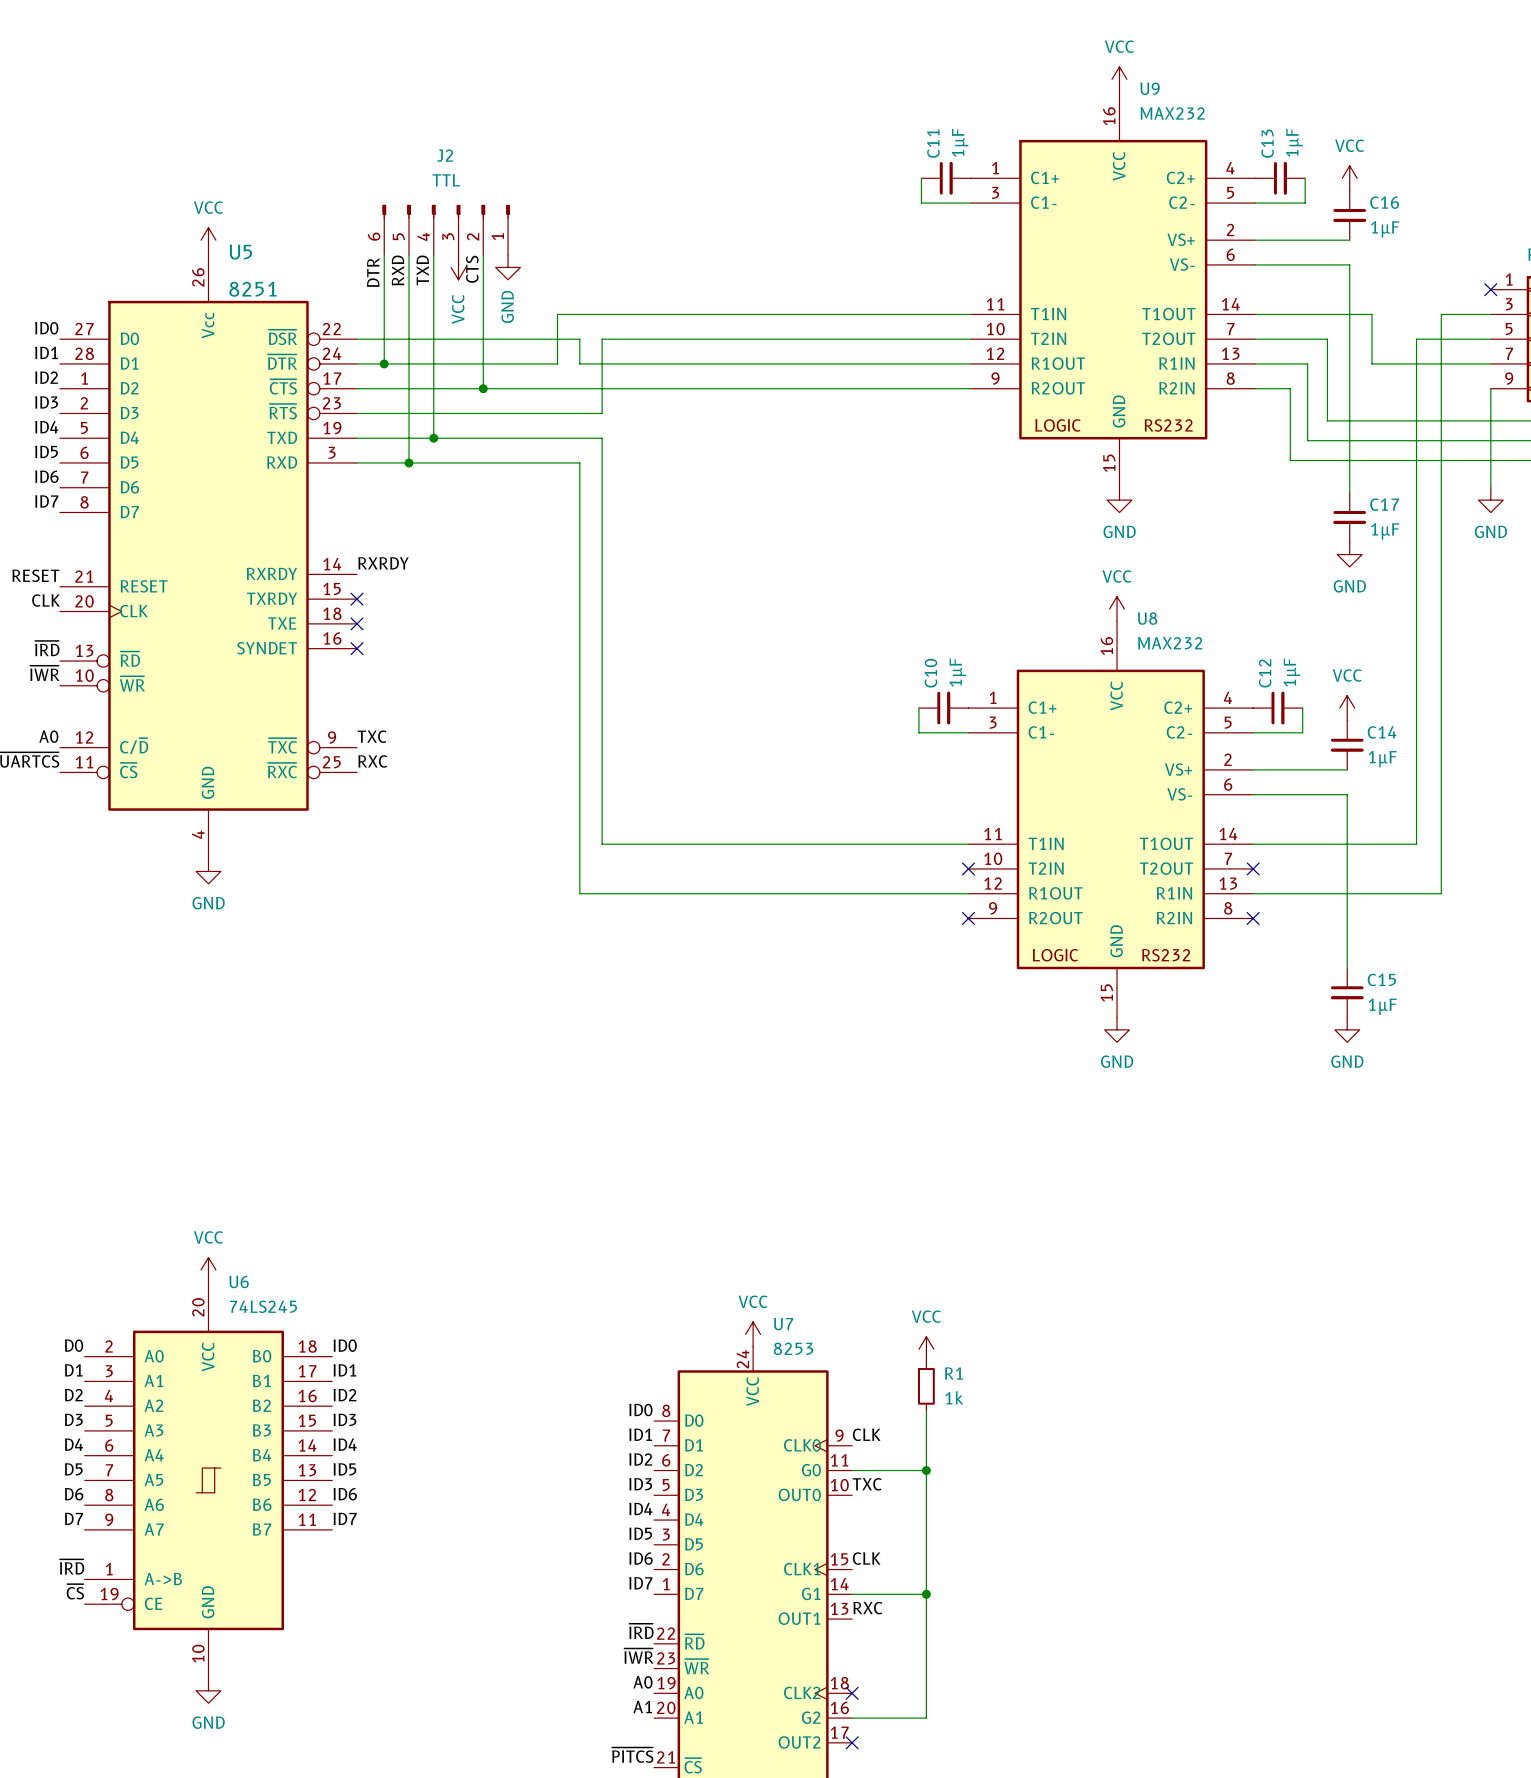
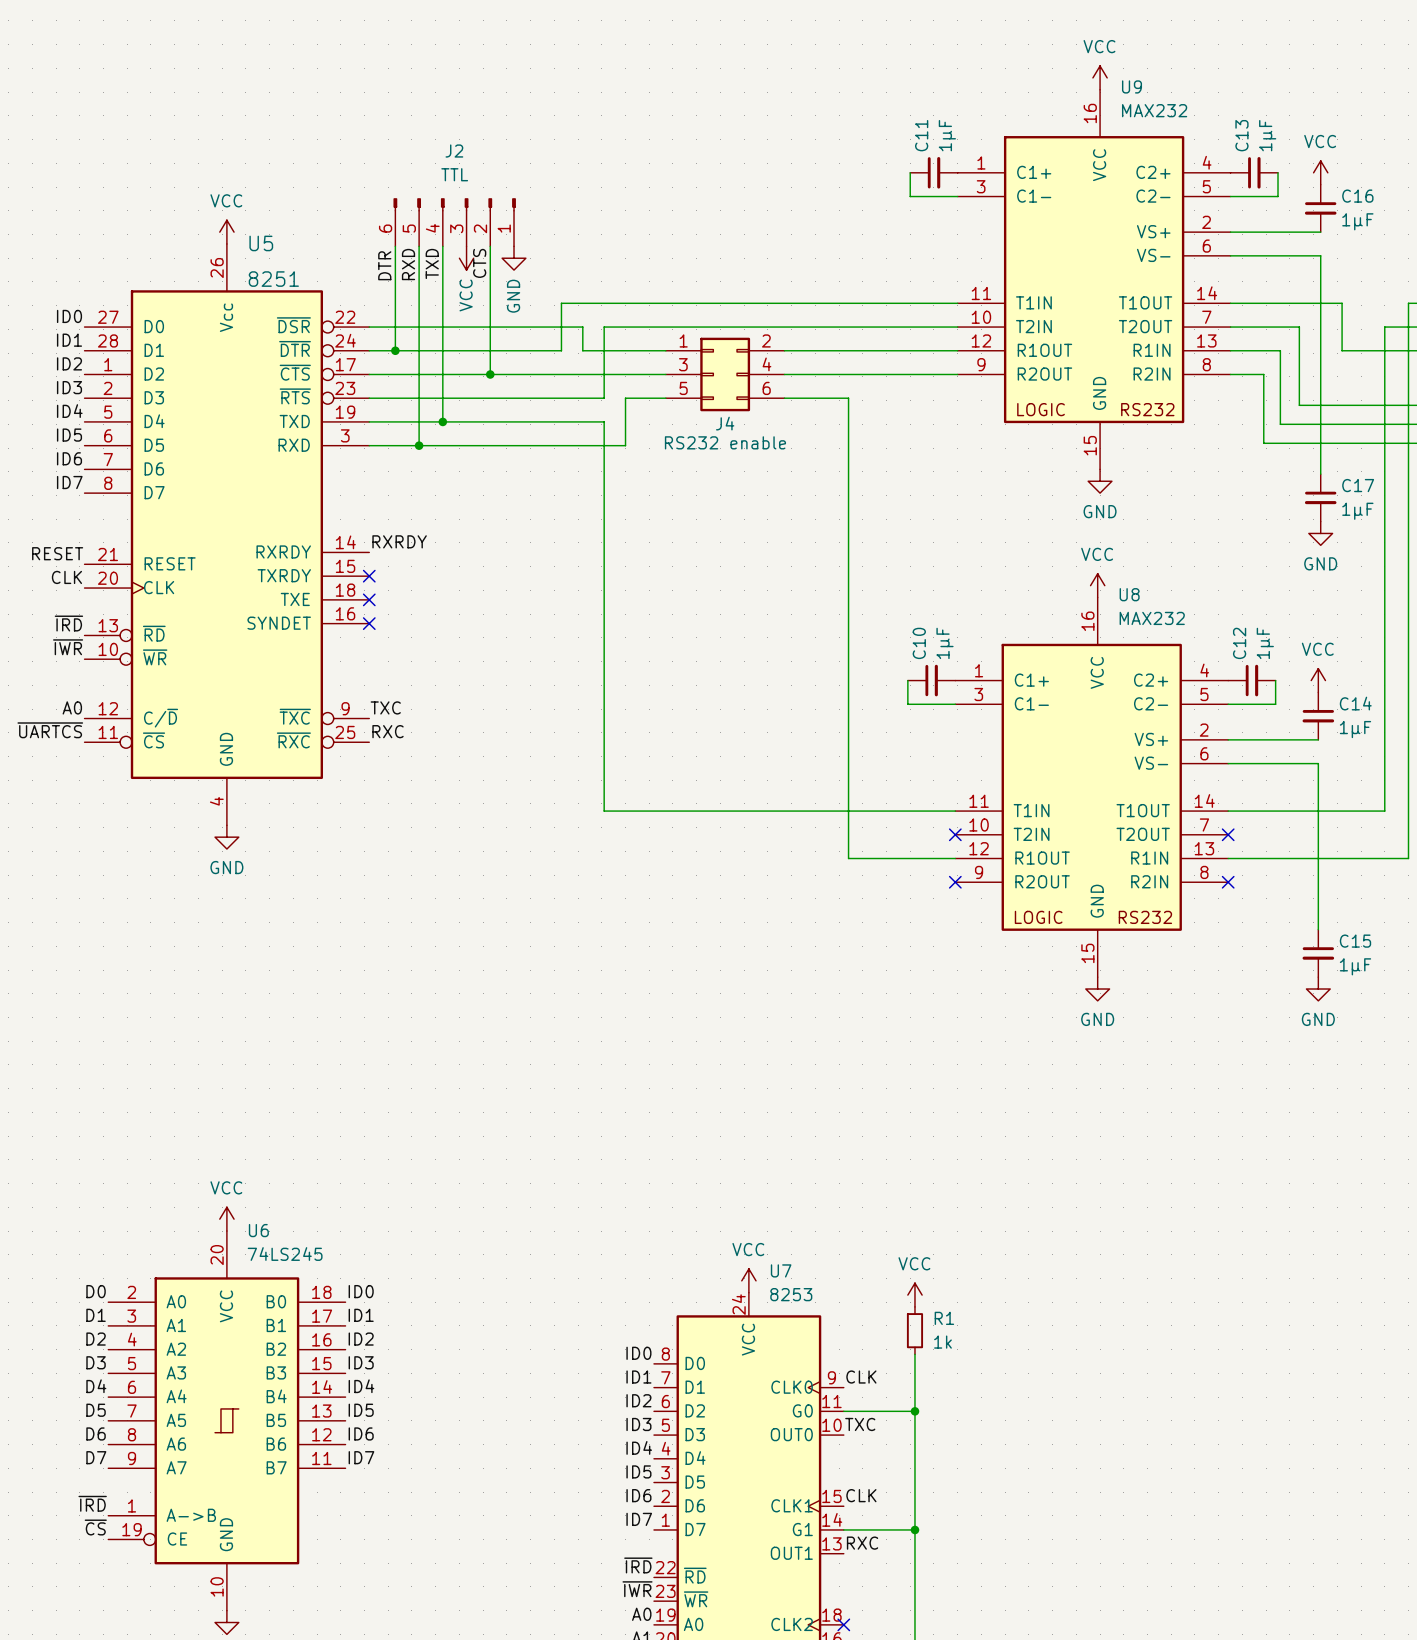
J4: none -> RS232 enable (725, 374)
wire: none -> (665, 398) (625, 398) (625, 445) (582, 445)
wire: (579, 462) (579, 893) (857, 893) -> (784, 398) (848, 398) (848, 858)

